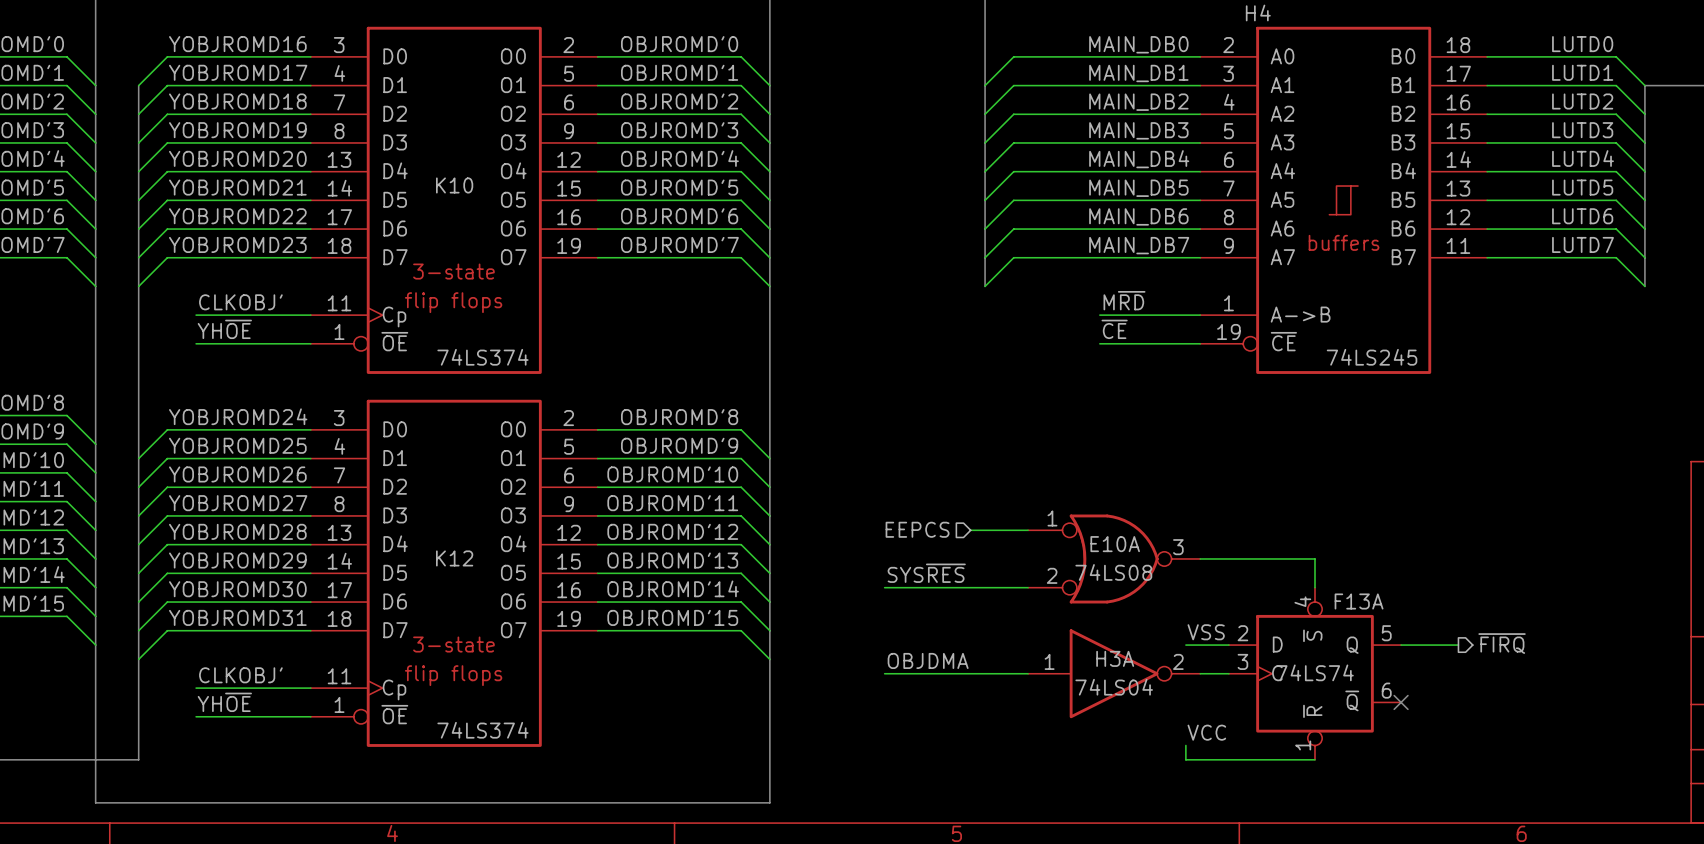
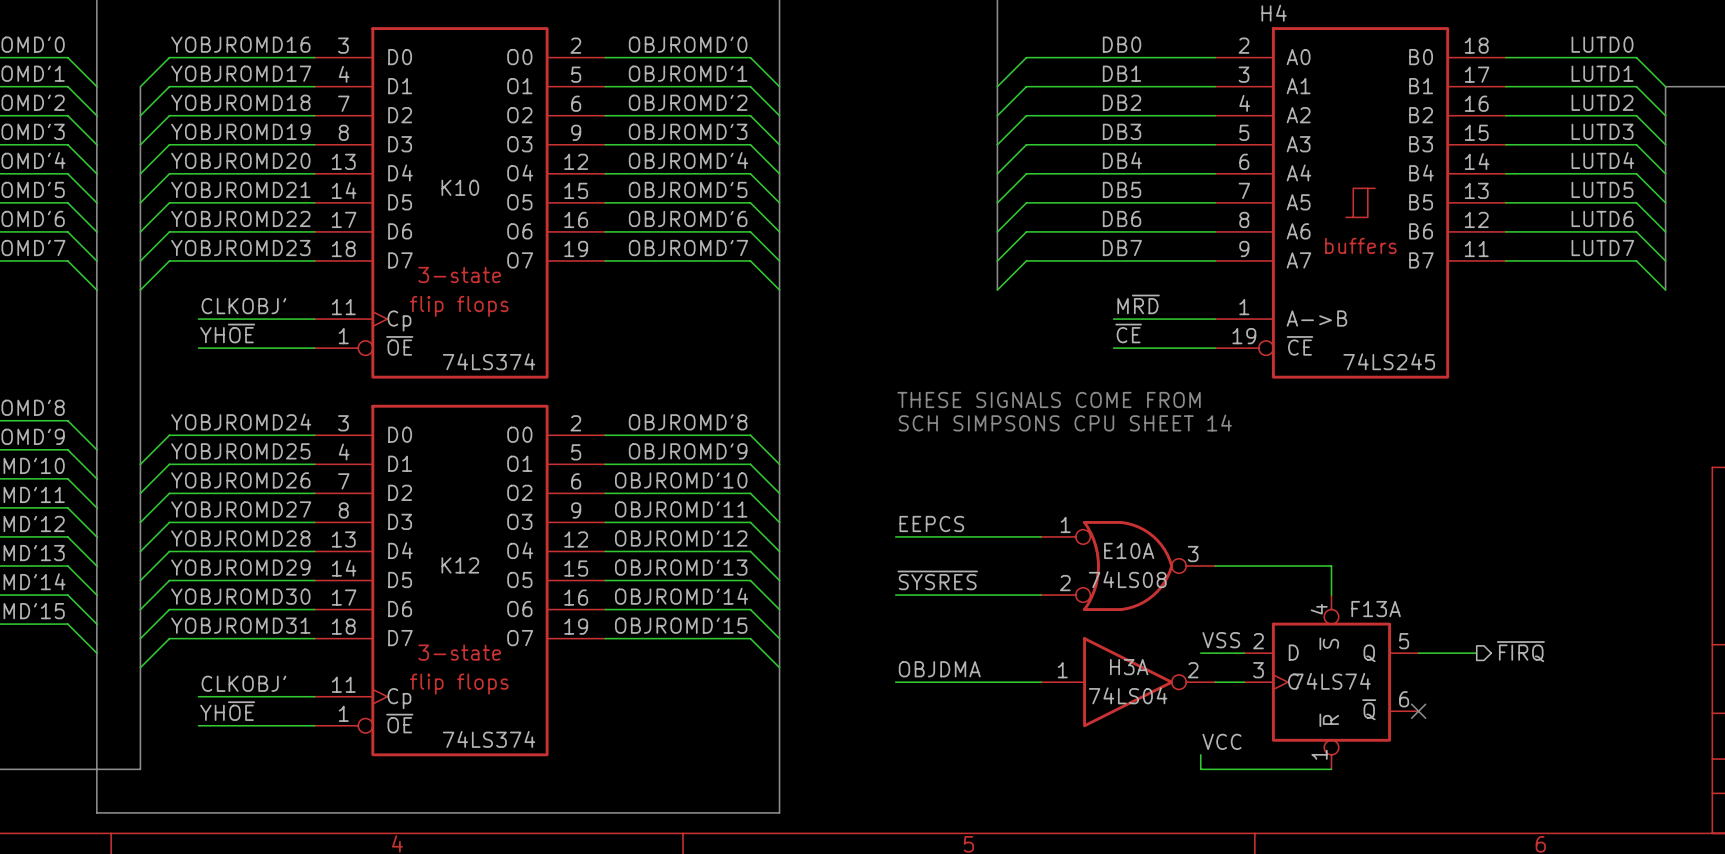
label: MAIN_DB0 (1138, 44) -> DB0 (1122, 44)
label: MAIN_DB1 (1138, 73) -> DB1 (1122, 73)
label: MAIN_DB2 (1138, 102) -> DB2 (1122, 102)
label: MAIN_DB3 (1138, 130) -> DB3 (1122, 131)
label: MAIN_DB4 (1139, 159) -> DB4 (1122, 160)
label: MAIN_DB5 (1138, 188) -> DB5 (1122, 189)
label: MAIN_DB6 (1138, 216) -> DB6 (1122, 218)
label: MAIN_DB7 (1139, 245) -> DB7 (1122, 248)
text: none -> THESE SIGNALS COME FROM (1049, 399)
text: none -> SCH SIMPSONS CPU SHEET 14 (1065, 423)
label: none -> EEPCS (931, 523)
hierarchical label: EEPCS (917, 529) -> none
wire: none -> (895, 536) (982, 536)
label: SYS~{RES} (926, 573) -> ~{SYSRES} (937, 580)

